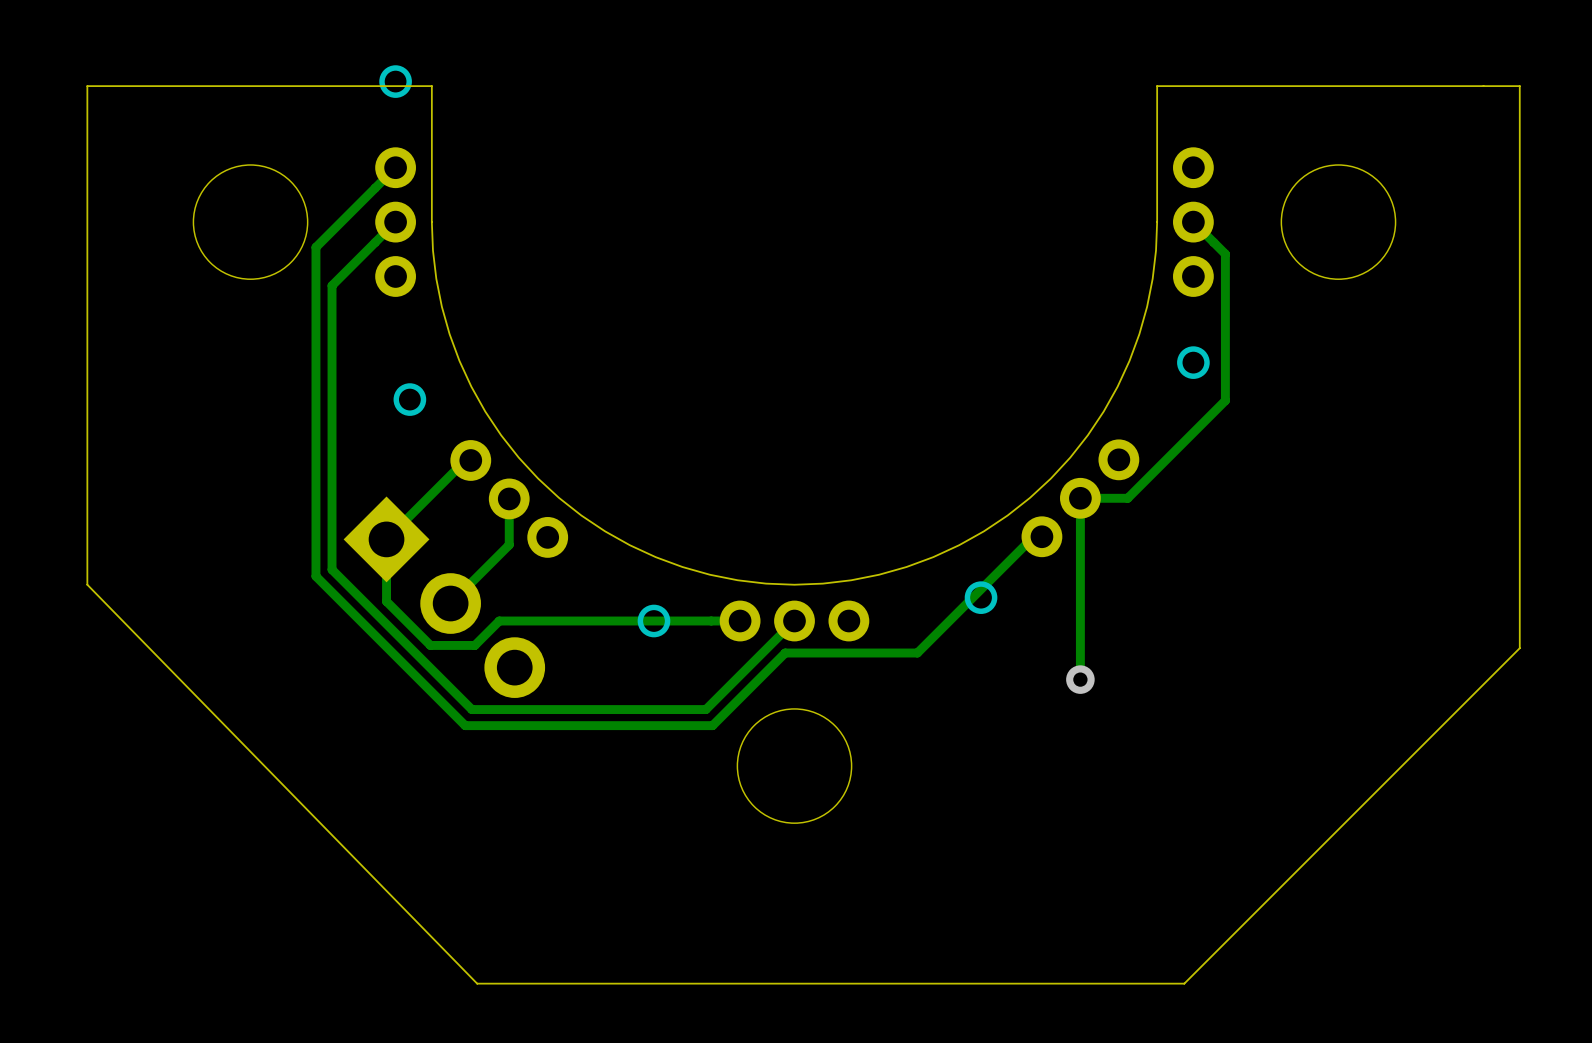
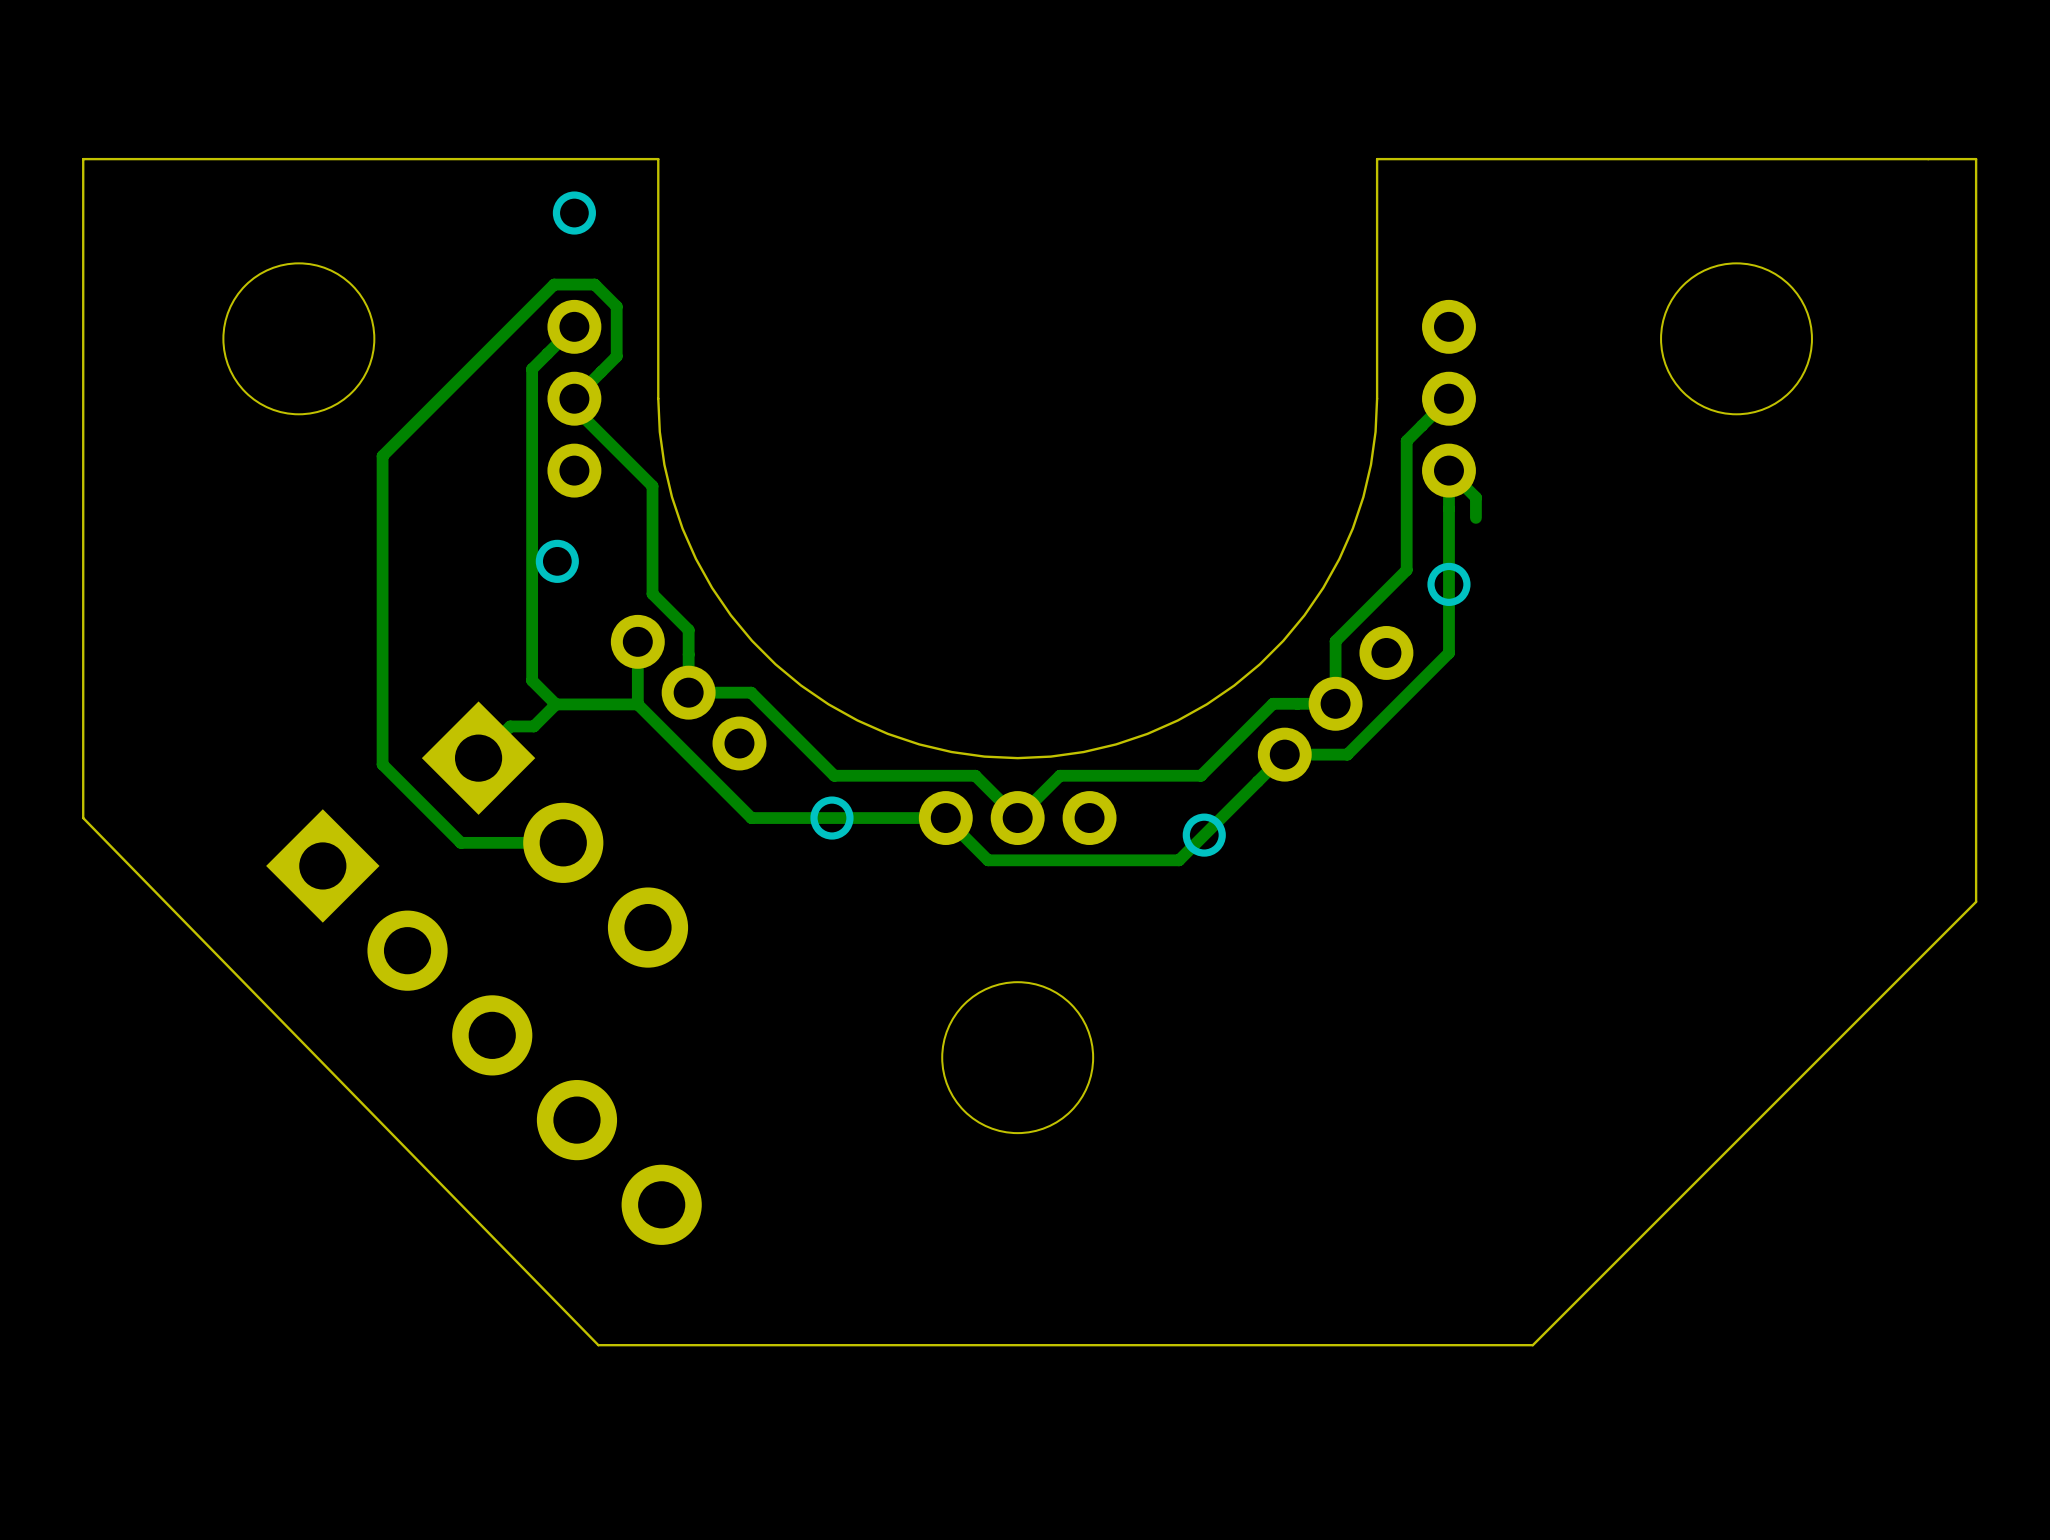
board edge: (1157, 86) (1157, 222) (1152, 278) (1147, 306) (1129, 360) (1117, 386) (1087, 435) (1070, 457) (1030, 497) (1007, 515) (959, 545) (906, 566) (879, 574) (822, 583) (794, 584) (766, 583) (709, 574) (682, 566) (629, 545) (581, 515) (558, 497) (538, 478) (501, 435) (485, 411) (459, 360) (441, 306) (436, 278) (431, 222) (431, 86) -> (1496, 159) (1377, 159) (1377, 398) (1375, 431) (1370, 464) (1363, 497) (1352, 528) (1339, 558) (1323, 587) (1304, 615) (1283, 640) (1259, 664) (1234, 685) (1206, 704) (1177, 720) (1147, 733) (1116, 744) (1083, 752) (1050, 756) (1017, 758) (984, 756) (951, 752) (919, 744) (887, 733) (857, 720) (828, 704) (801, 685) (775, 664) (752, 640) (730, 615) (712, 587) (695, 558) (682, 528) (671, 497) (664, 464) (659, 431) (658, 398) (658, 159) (538, 159)
track: (395, 167) (315, 247) (315, 576) (465, 725) (712, 725) (785, 653) (917, 653) (1033, 536) -> (637, 704) (751, 818) (945, 818) (988, 860) (1179, 860) (1284, 754) (1333, 754)
part position: (395, 181) -> (574, 344)
track: none -> (574, 326) (532, 369) (532, 680) (555, 704)
track: (395, 222) (332, 285) (332, 569) (471, 709) (705, 709) (794, 621) -> none
track: (1193, 222) (1225, 254) (1225, 400) (1127, 498) (1080, 498) (1080, 679) -> none
part position: (1193, 263) -> (1448, 452)
track: none -> (1475, 517) (1475, 497) (1448, 470) (1448, 652) (1347, 754) (1344, 754)
track: none -> (637, 641) (637, 704)
track: (470, 460) (465, 460) (410, 515) -> (555, 704) (533, 726) (510, 726)
part position: (480, 470) -> (651, 655)
track: none -> (637, 704) (555, 704)
track: (509, 498) (509, 544) (450, 603) -> (1448, 398) (1406, 441) (1406, 570) (1335, 641) (1335, 703) (1273, 703) (1201, 775) (1059, 775) (1017, 818) (975, 775) (834, 775) (751, 692) (688, 692) (688, 630) (652, 593) (652, 486) (574, 408) (574, 398) (616, 356) (616, 306) (594, 284) (554, 284) (382, 456) (382, 764) (460, 842) (563, 842)
part position: (1051, 526) -> (1298, 741)
track: (386, 539) (386, 601) (430, 645) (474, 645) (499, 621) (740, 621) -> none
part position: (753, 621) -> (963, 818)
via: (1080, 679) -> none
part: none -> (483, 1027)

